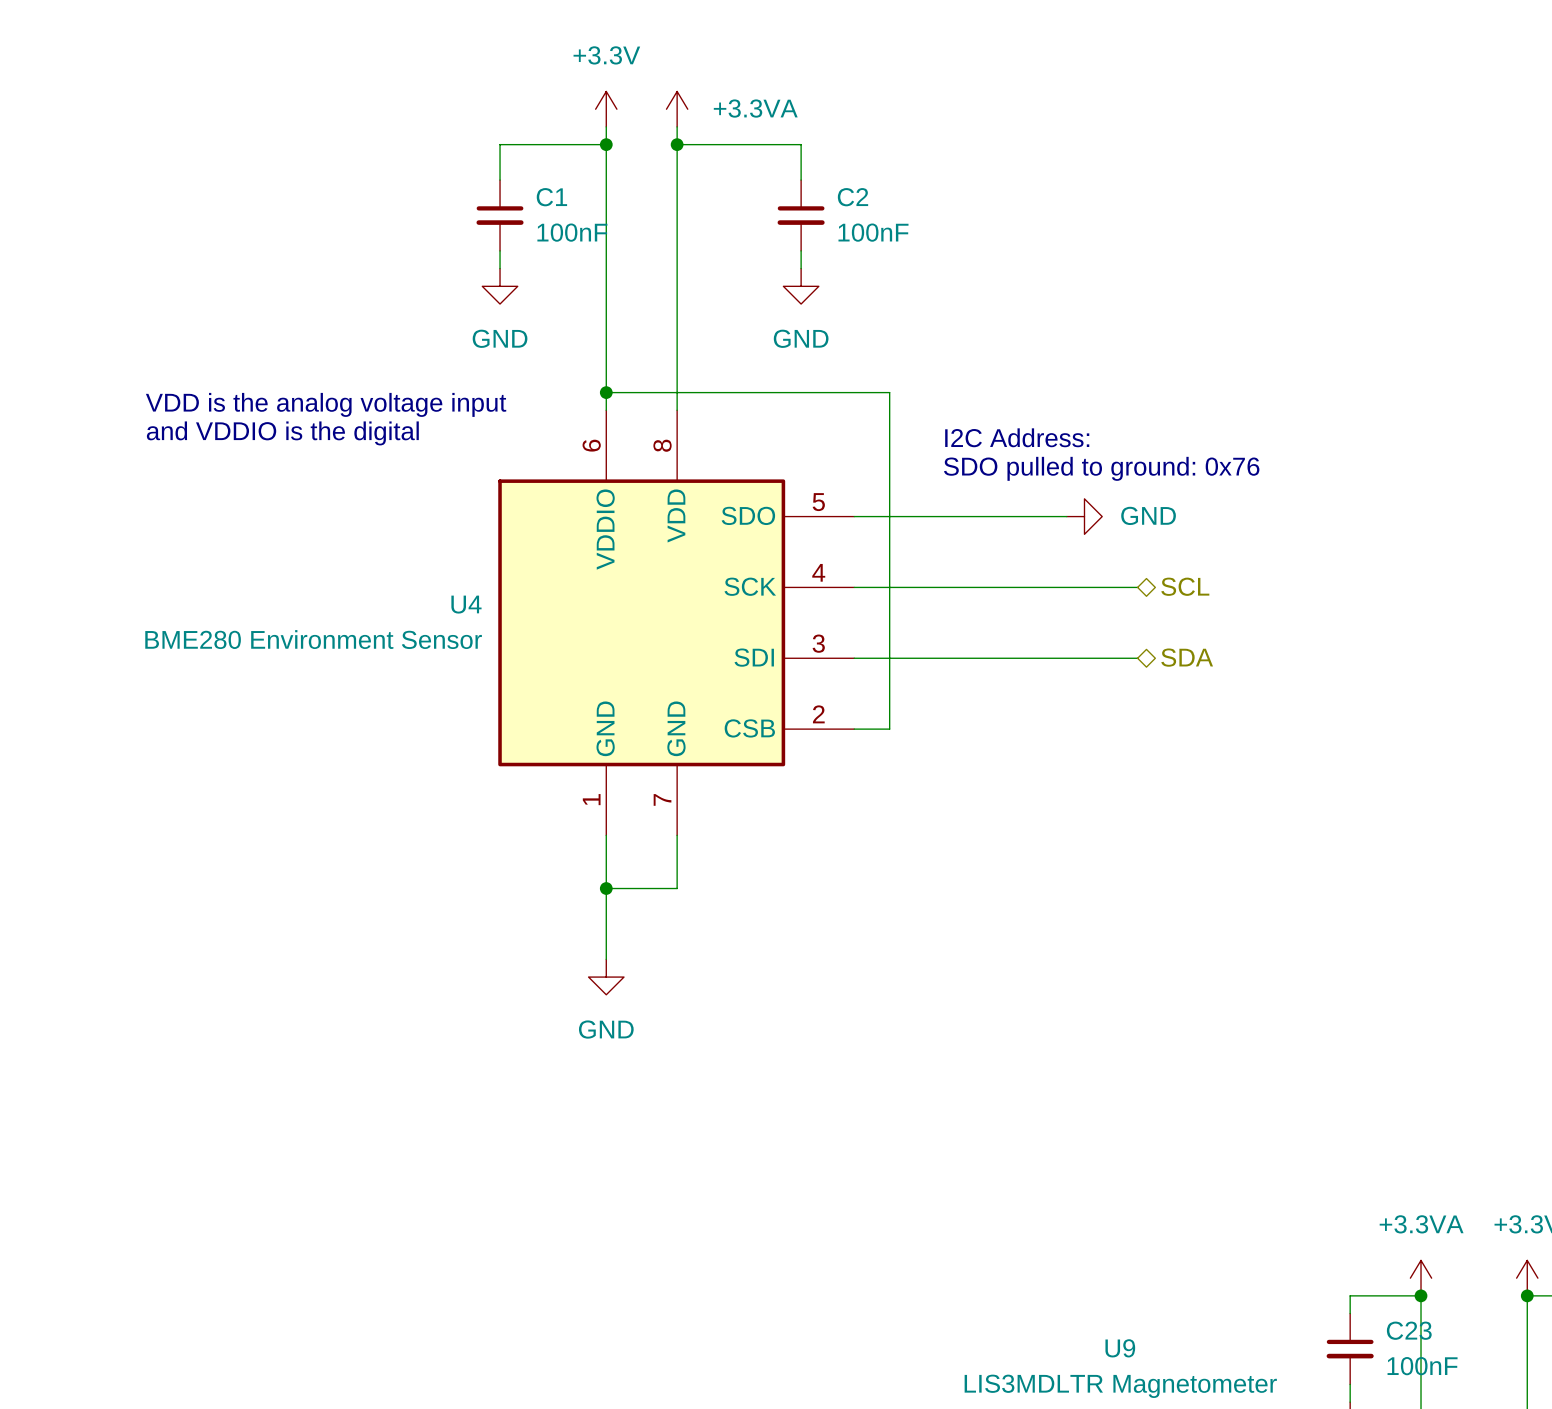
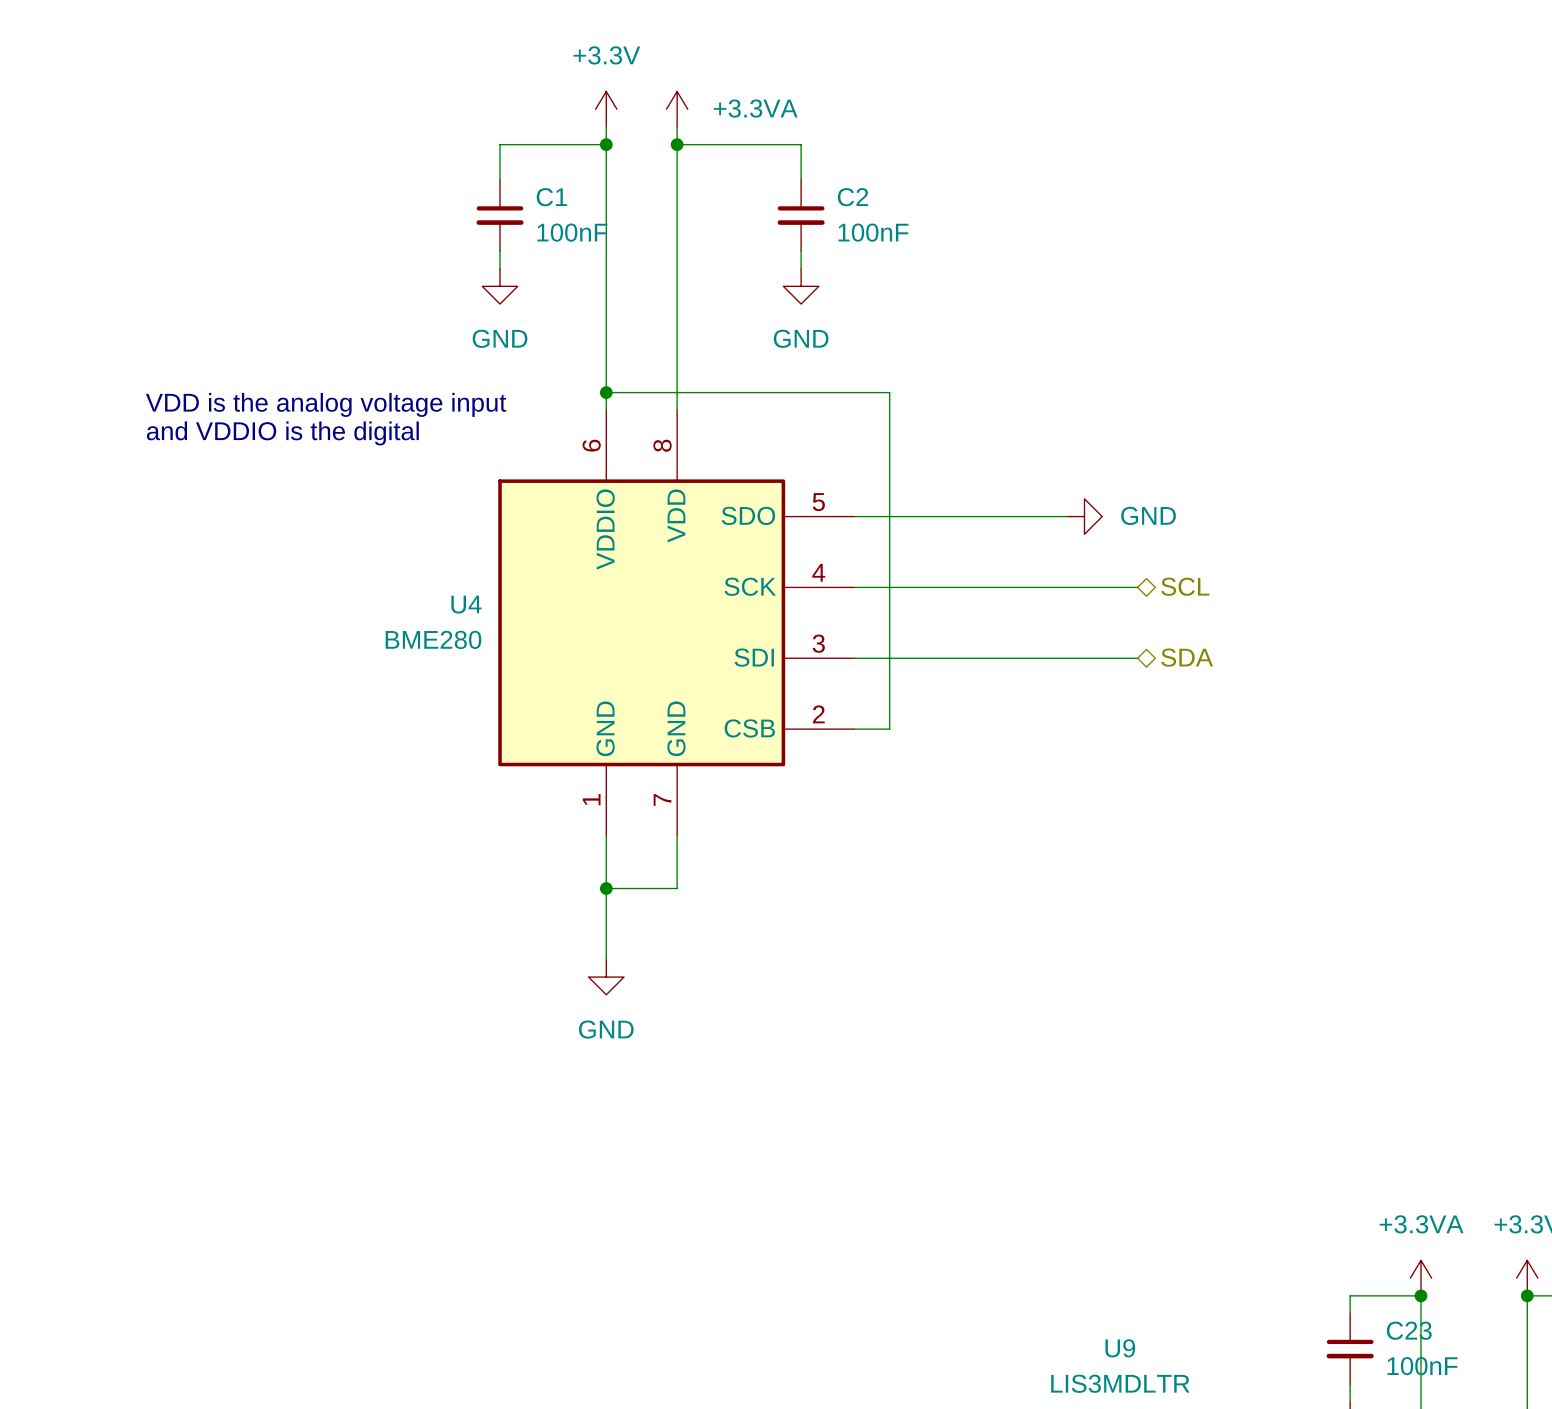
text: I2C Address: (1017, 437) -> none
text: SDO pulled to ground: 0x76 (1101, 468) -> none
U4 value: BME280 Environment Sensor (313, 639) -> BME280 (433, 639)
U9 value: LIS3MDLTR Magnetometer (1120, 1386) -> LIS3MDLTR (1120, 1383)

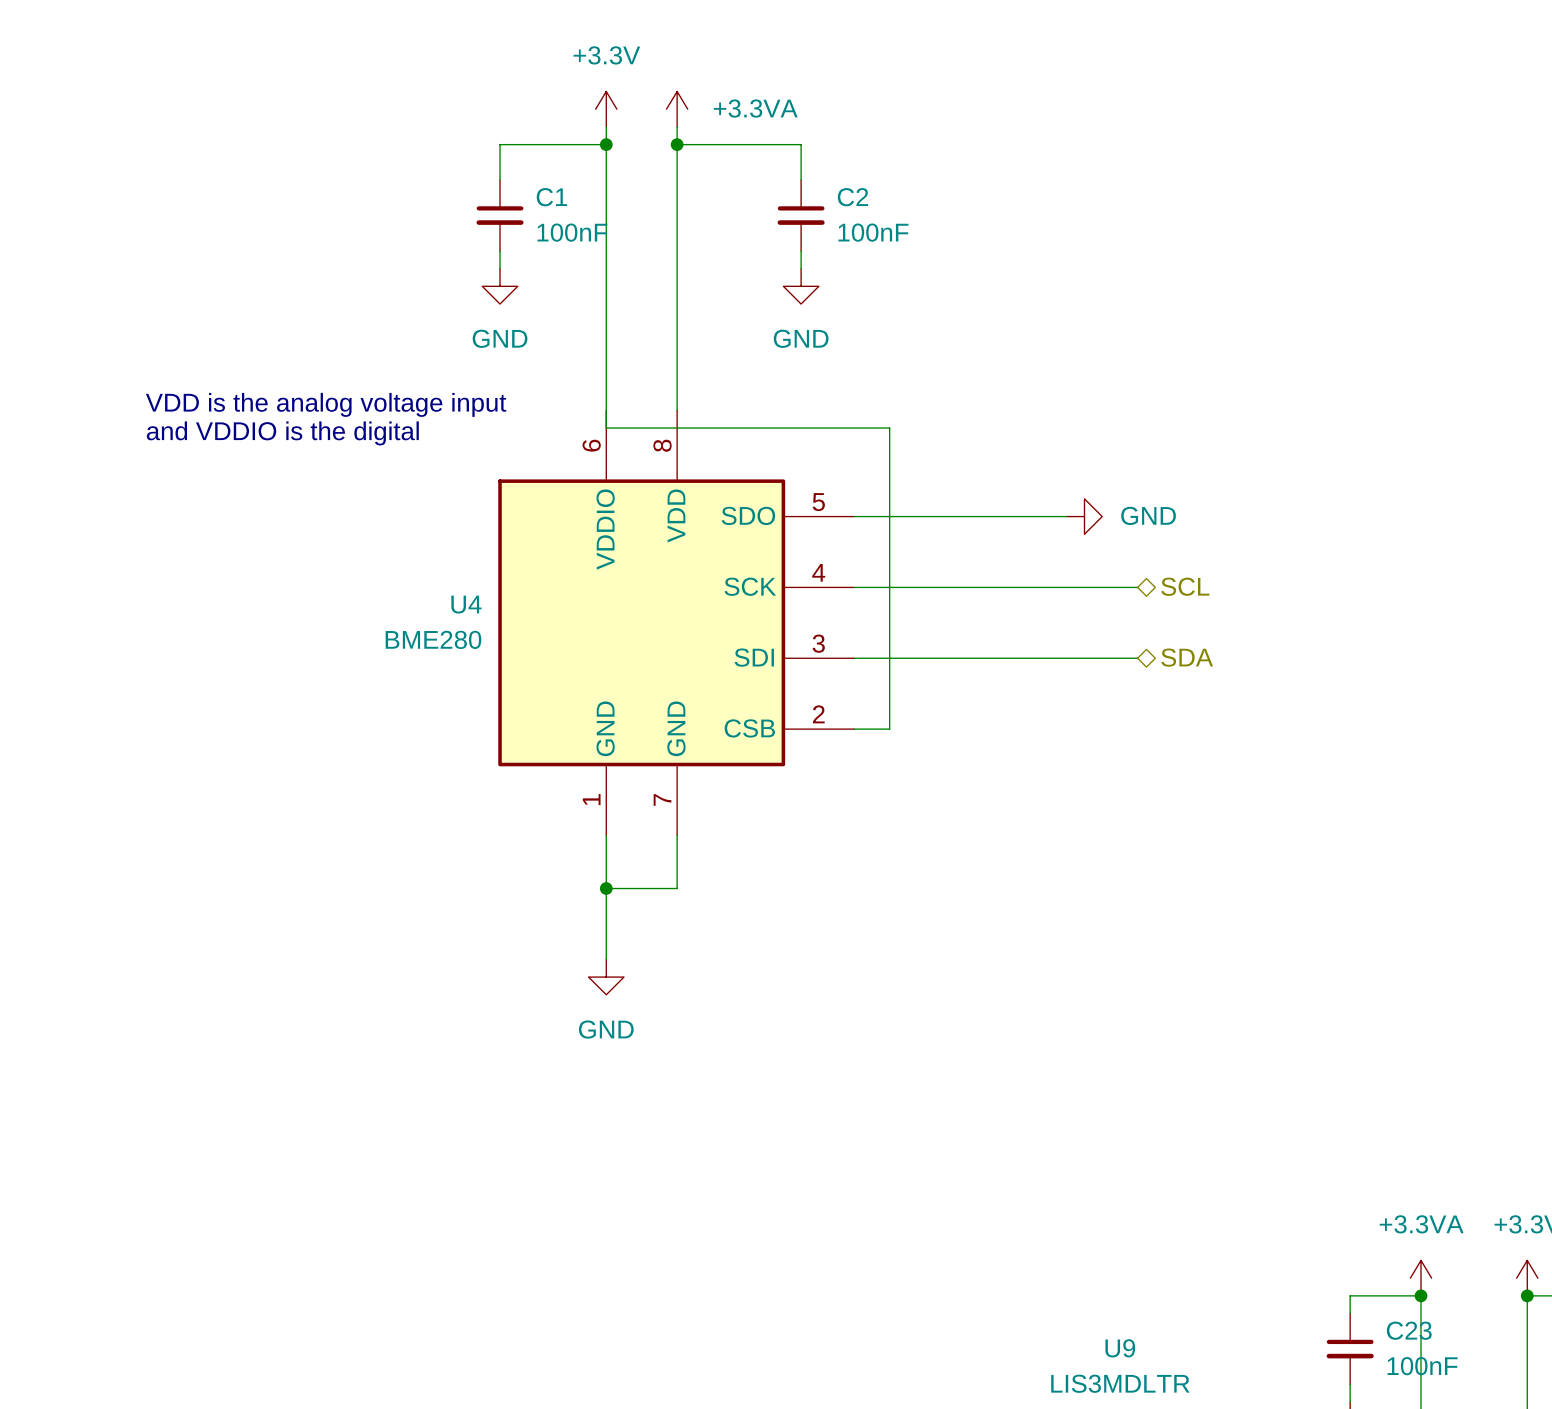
wire: (606, 392) (889, 392) (889, 428) -> (606, 410) (606, 428) (889, 428)
junction: (606, 392) -> none

